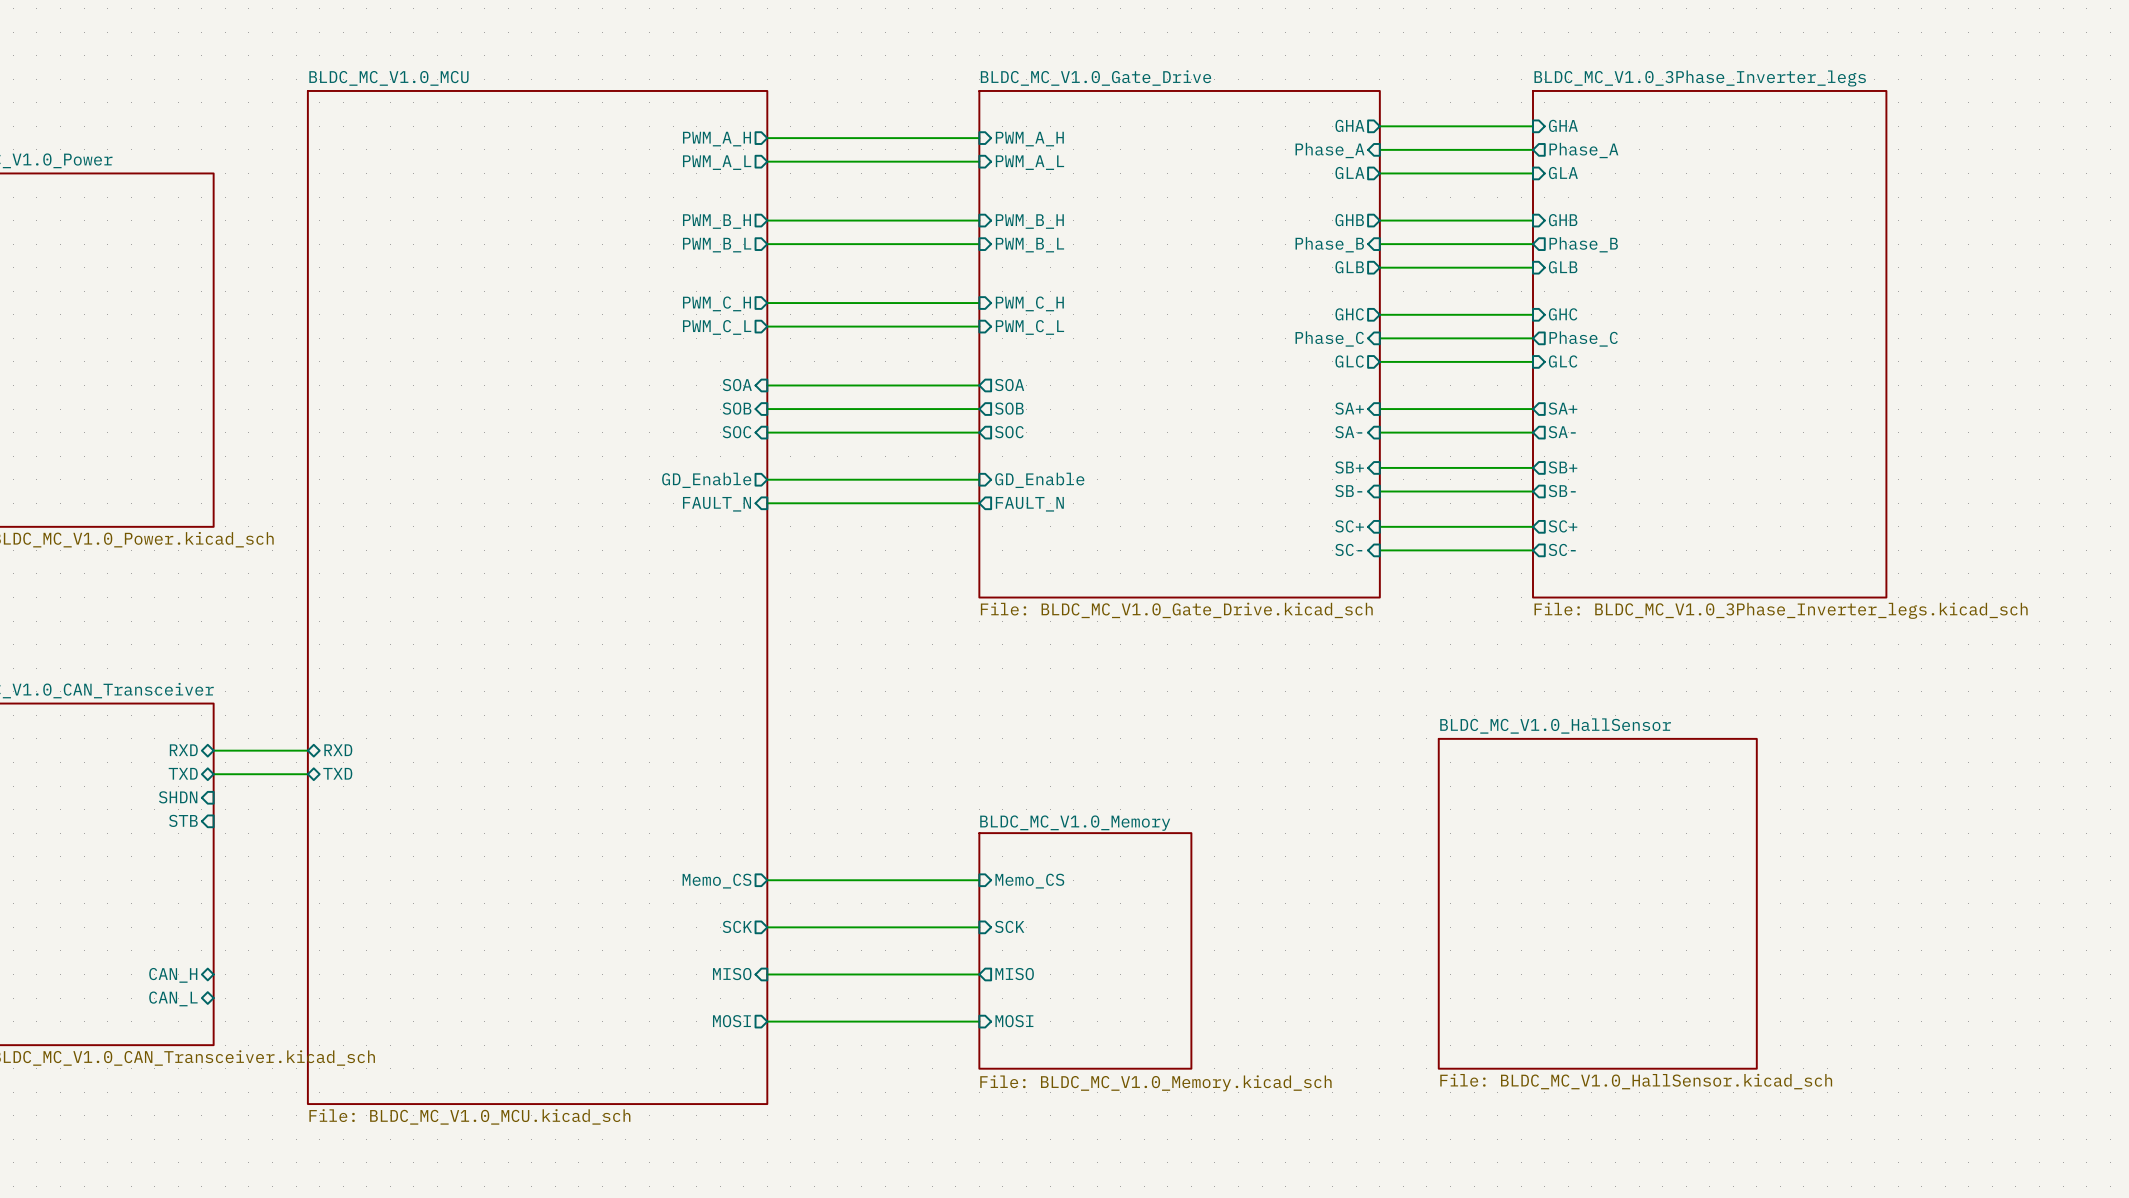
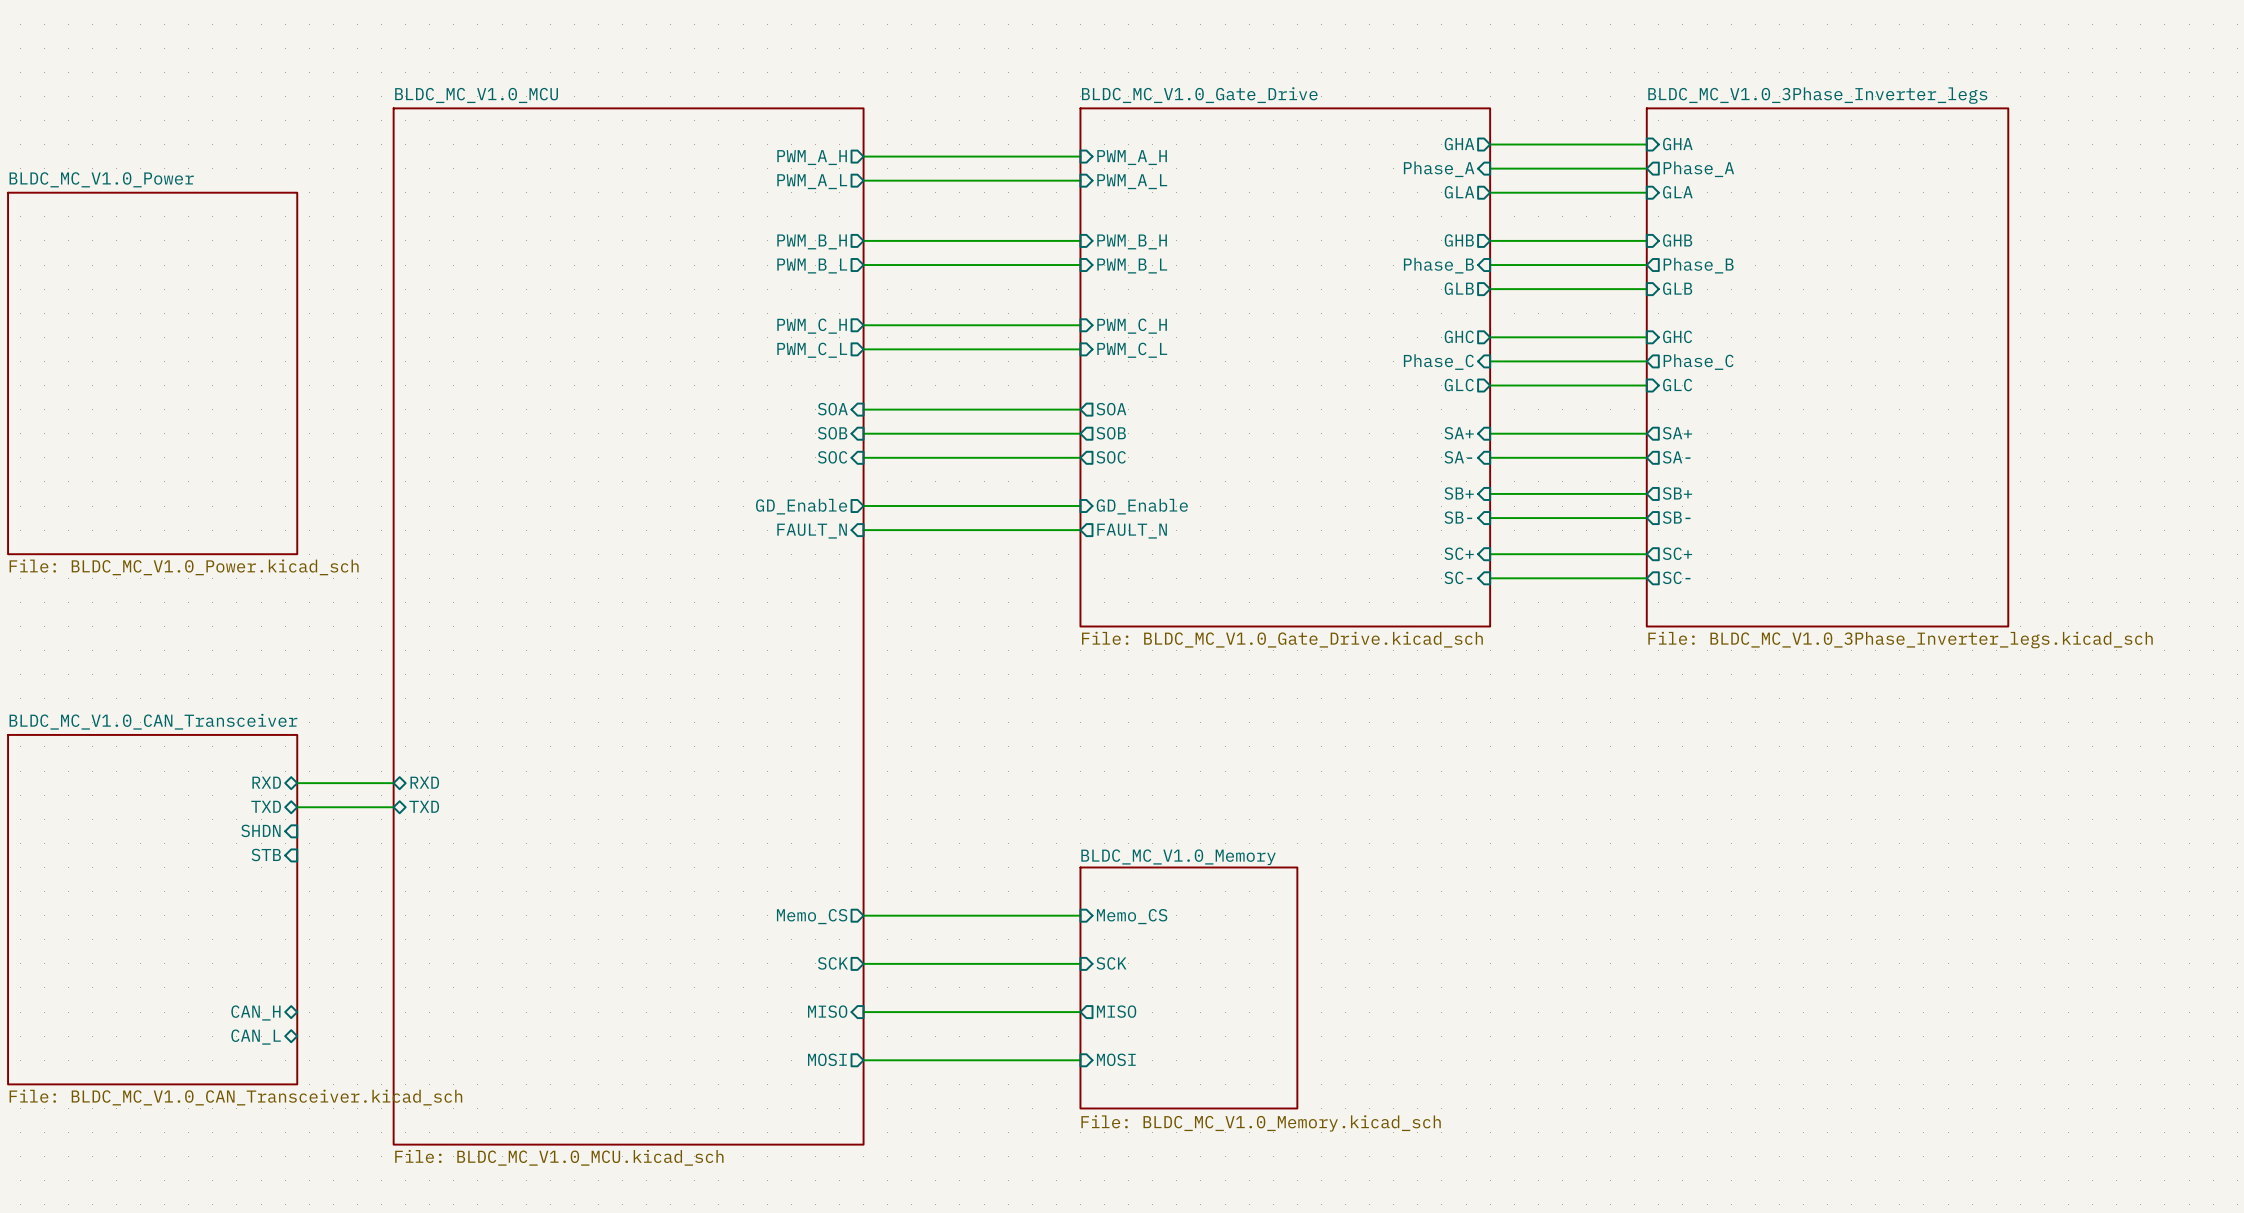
sheet BLDC_MC_V1.0_HallSensor: File: BLDC_MC_V1.0_HallSensor.kicad_sch (1597, 903) -> none

